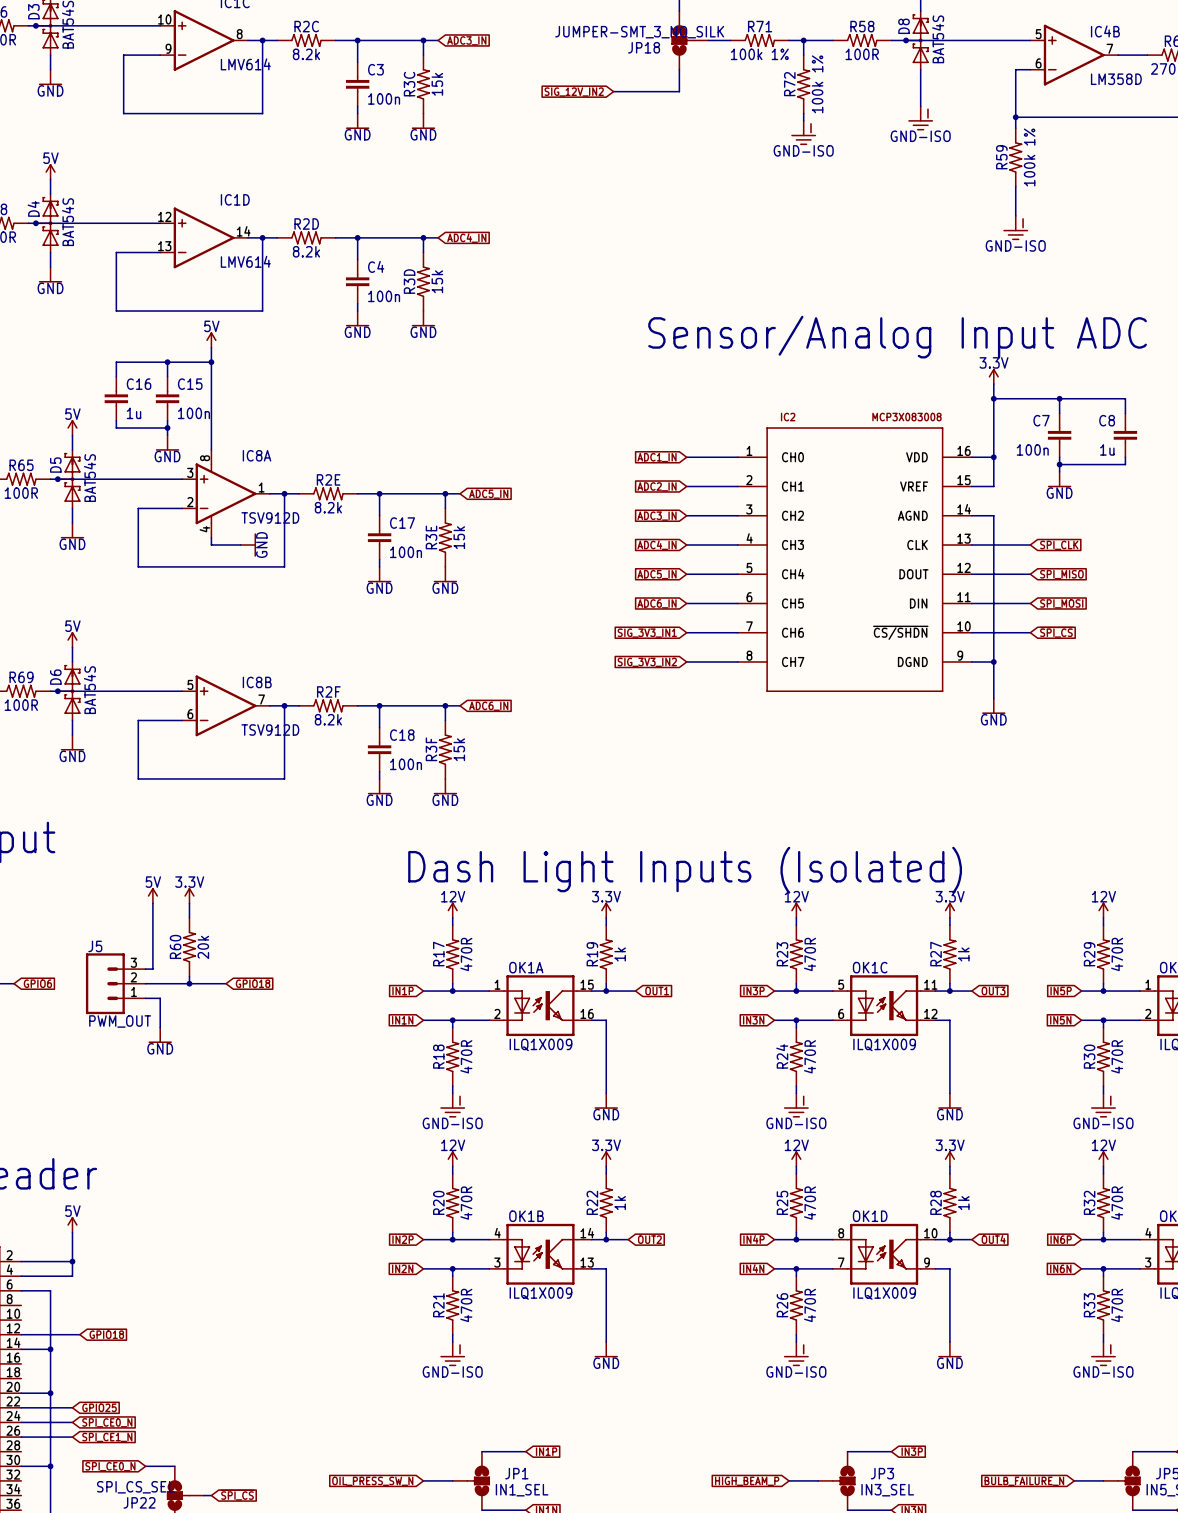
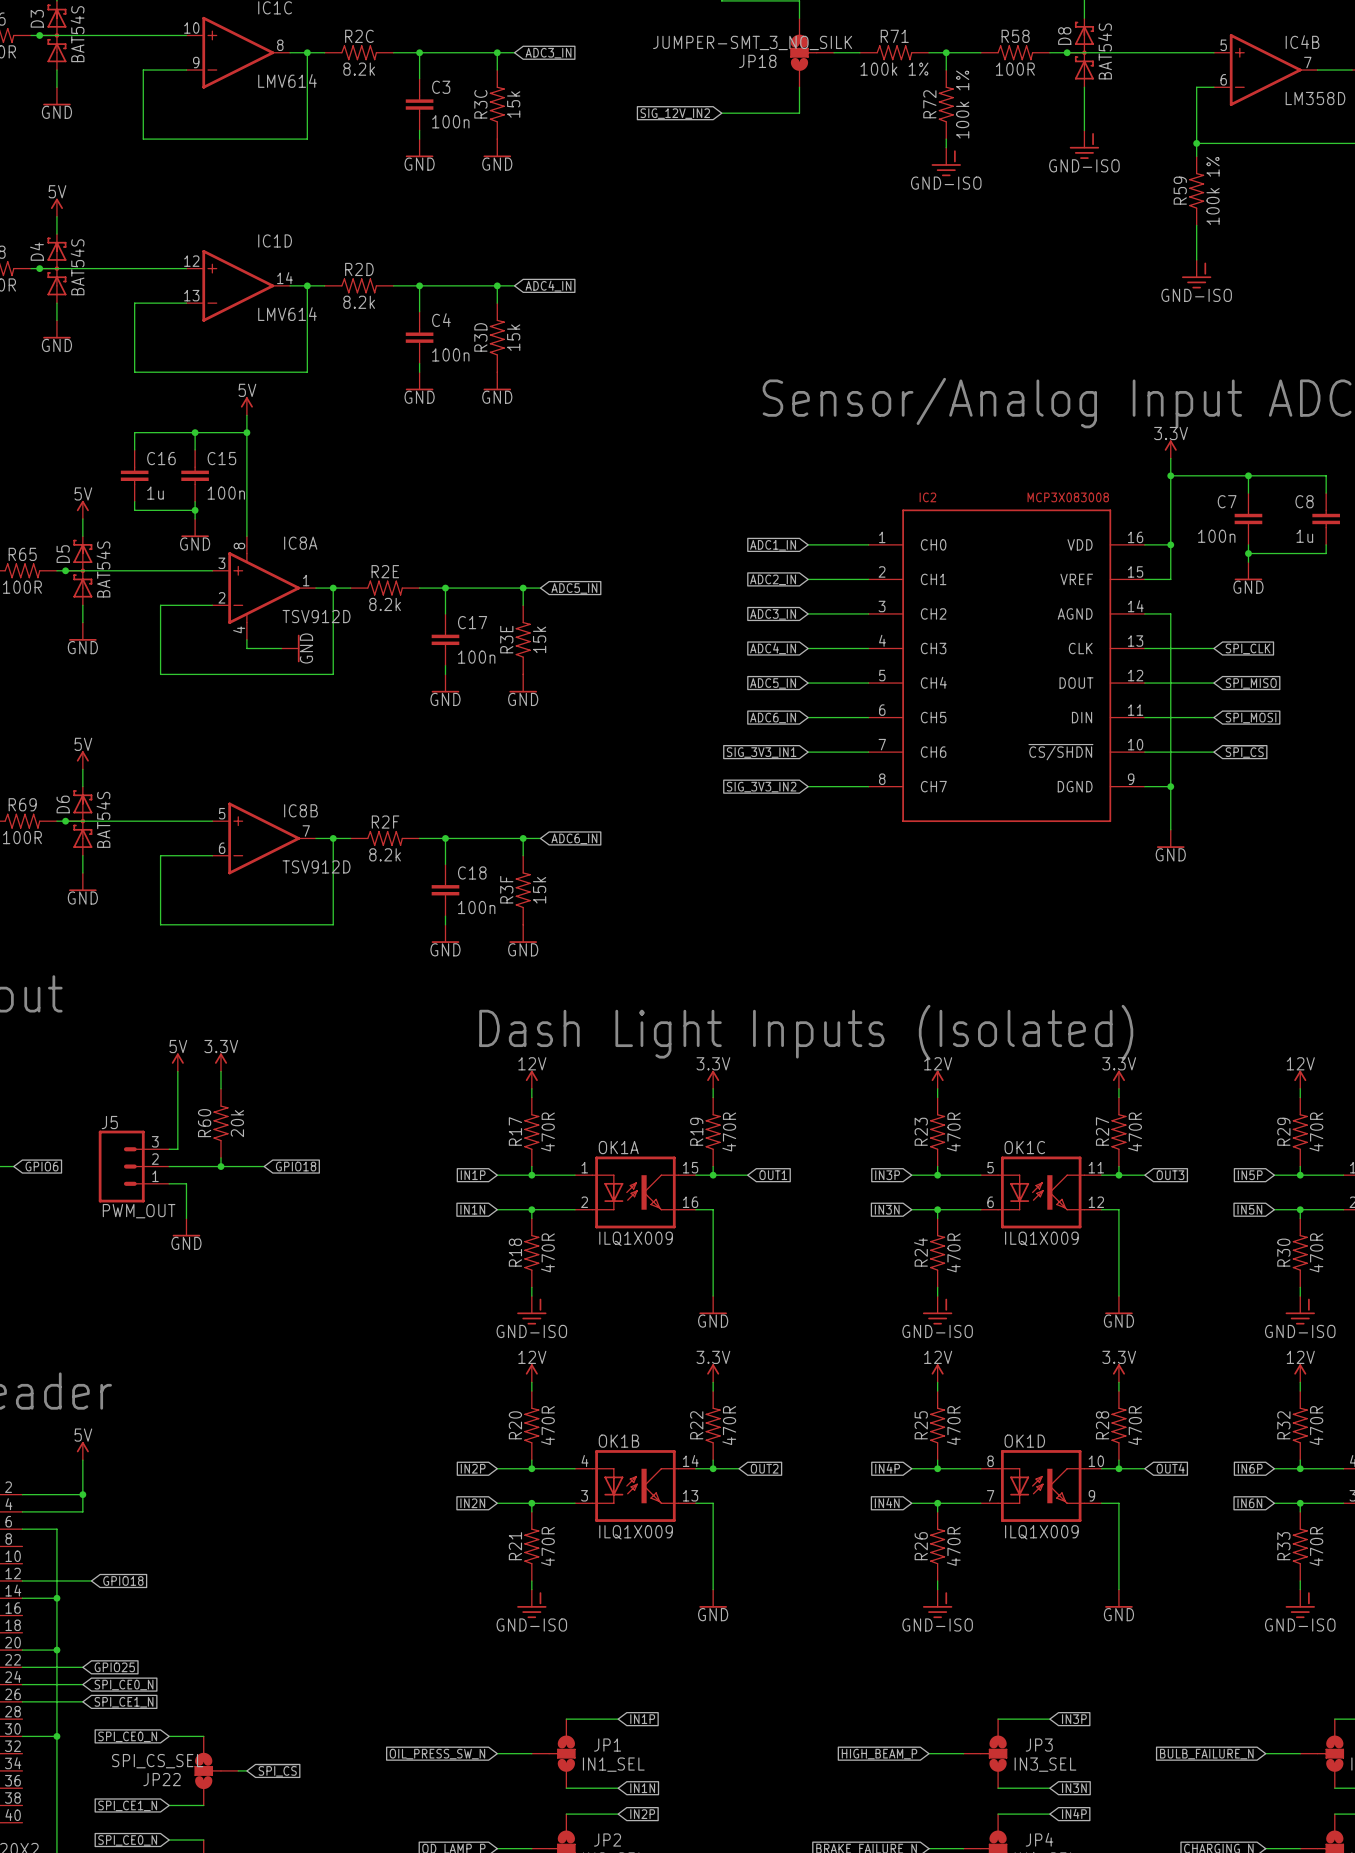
R19 value: 1k (620, 954) -> 470R (729, 1132)
R27 value: 1k (963, 954) -> 470R (1135, 1132)
R22 value: 1k (620, 1203) -> 470R (729, 1425)
R28 value: 1k (963, 1203) -> 470R (1135, 1425)

